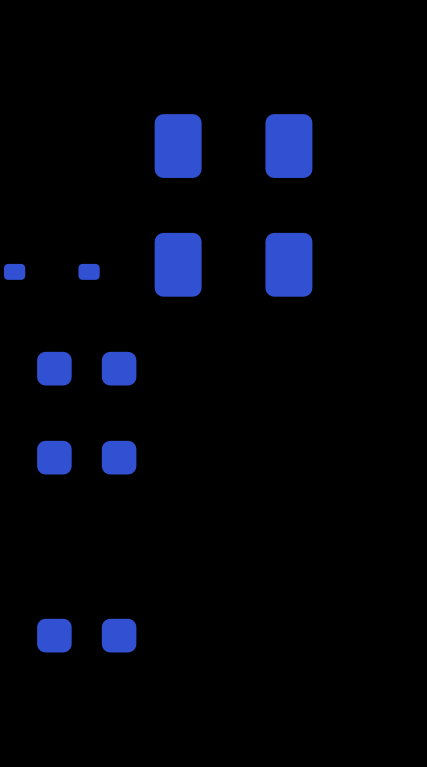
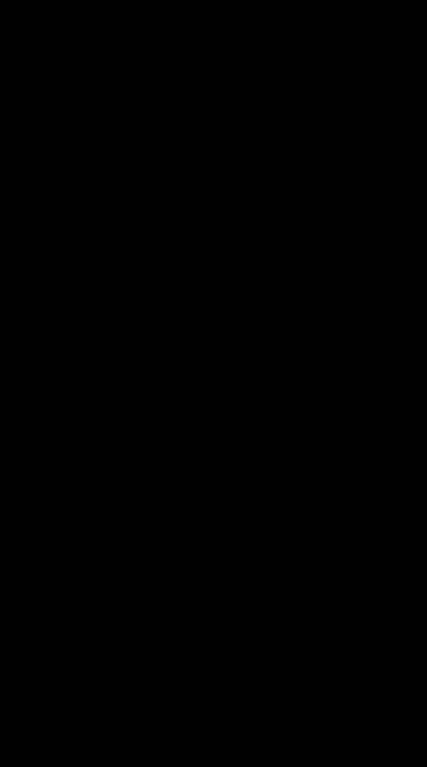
part: (233, 146) -> none
part: (233, 264) -> none
part: (51, 271) -> none
part: (86, 368) -> none
part: (86, 457) -> none
part: (86, 635) -> none

